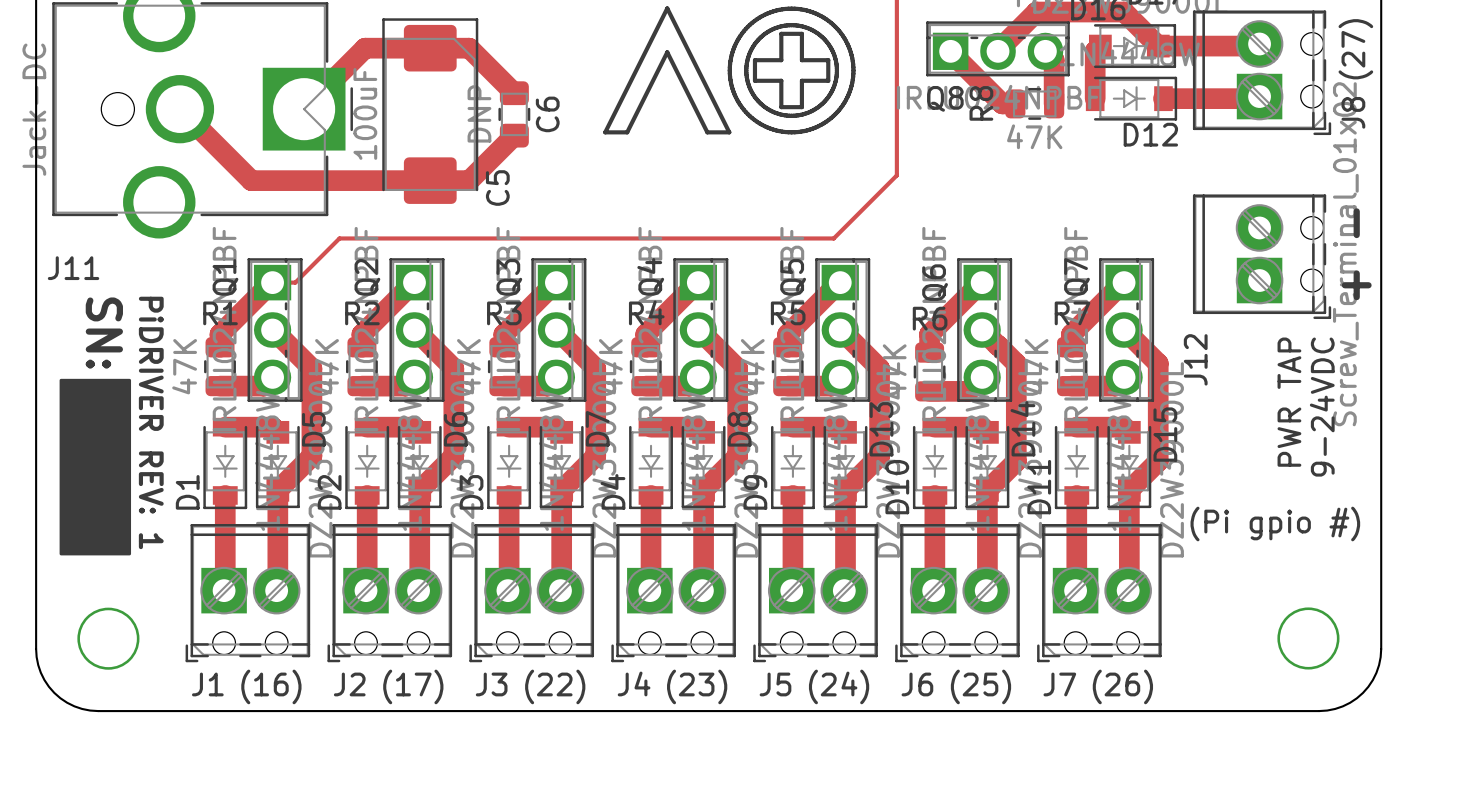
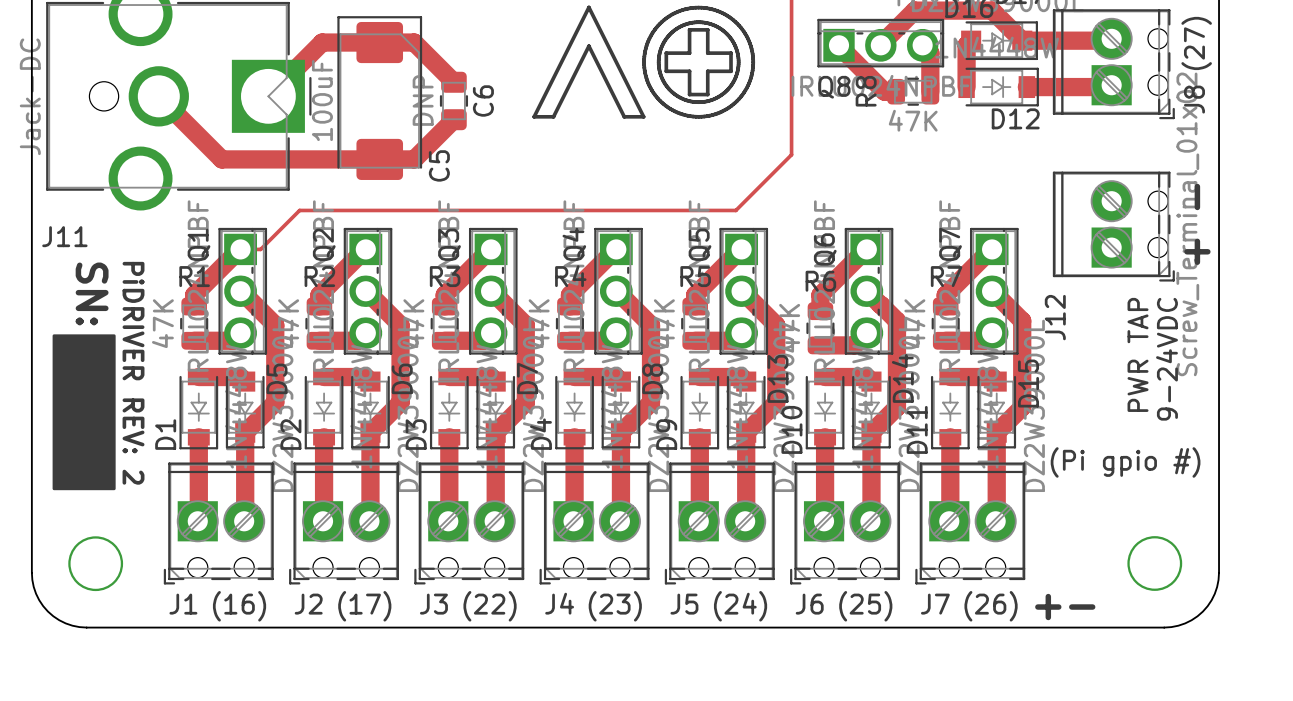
text: PiDRIVER REV: 1 (151, 422) -> PiDRIVER REV: 2 (133, 373)
text: none -> +- (1065, 607)

